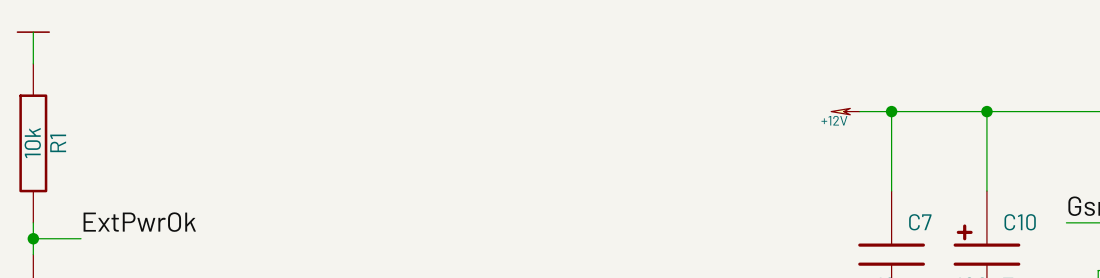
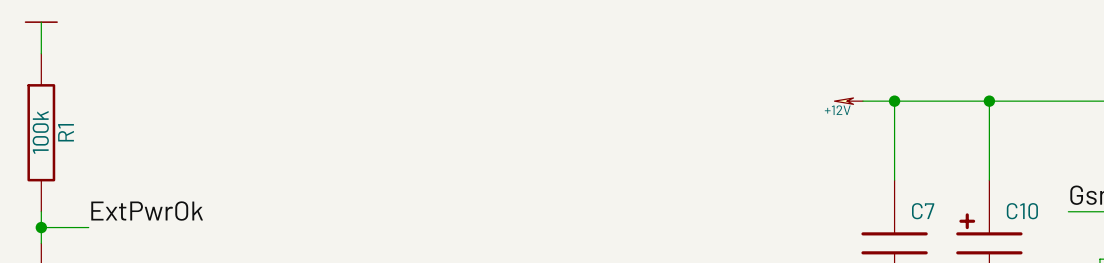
R1 value: 10k (32, 143) -> 100k (40, 132)

